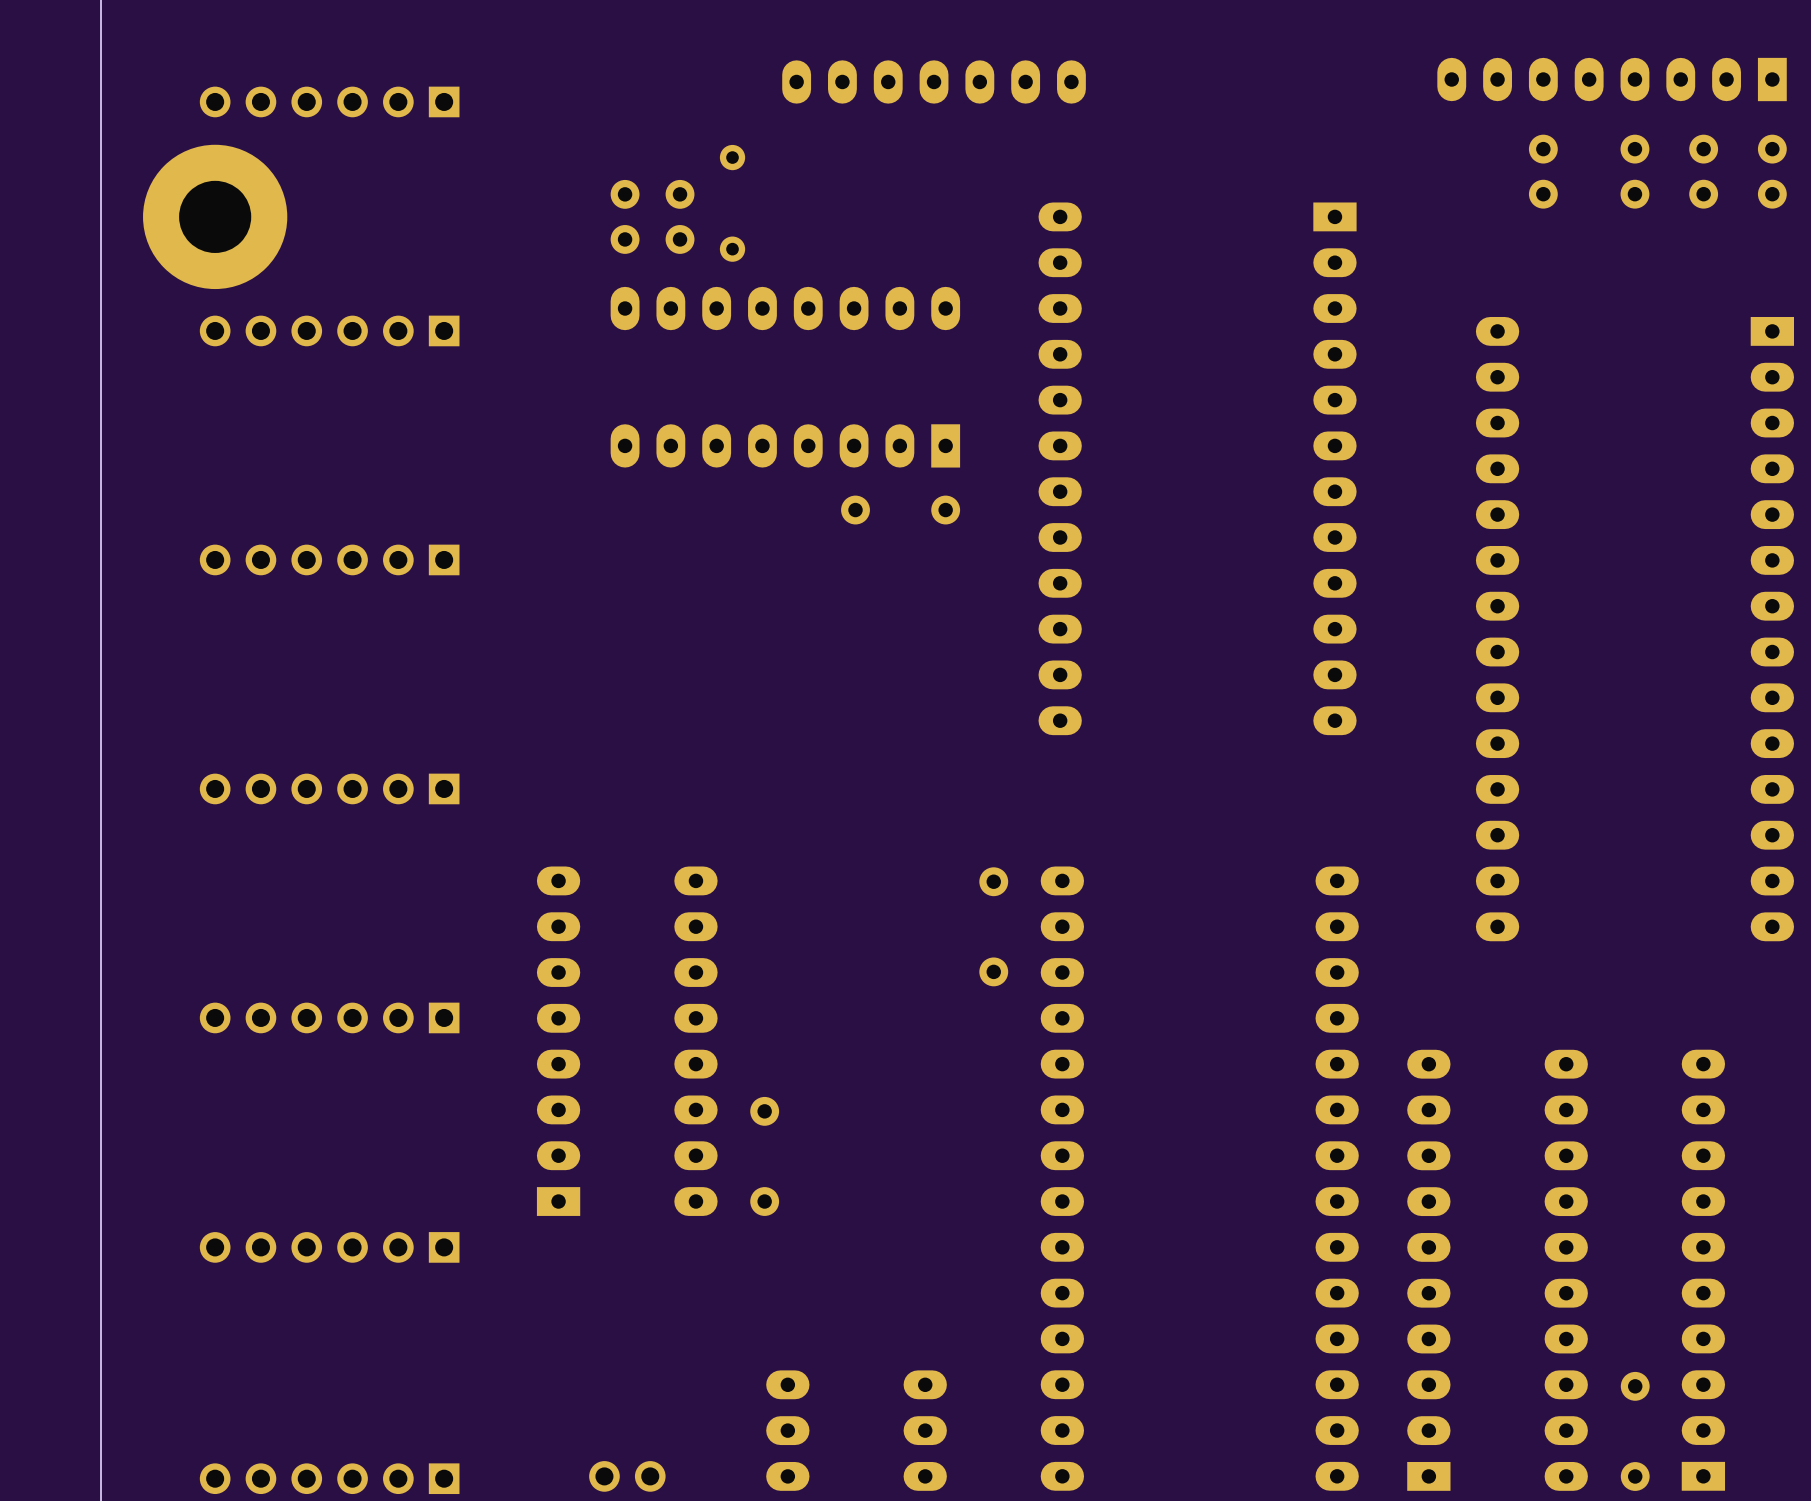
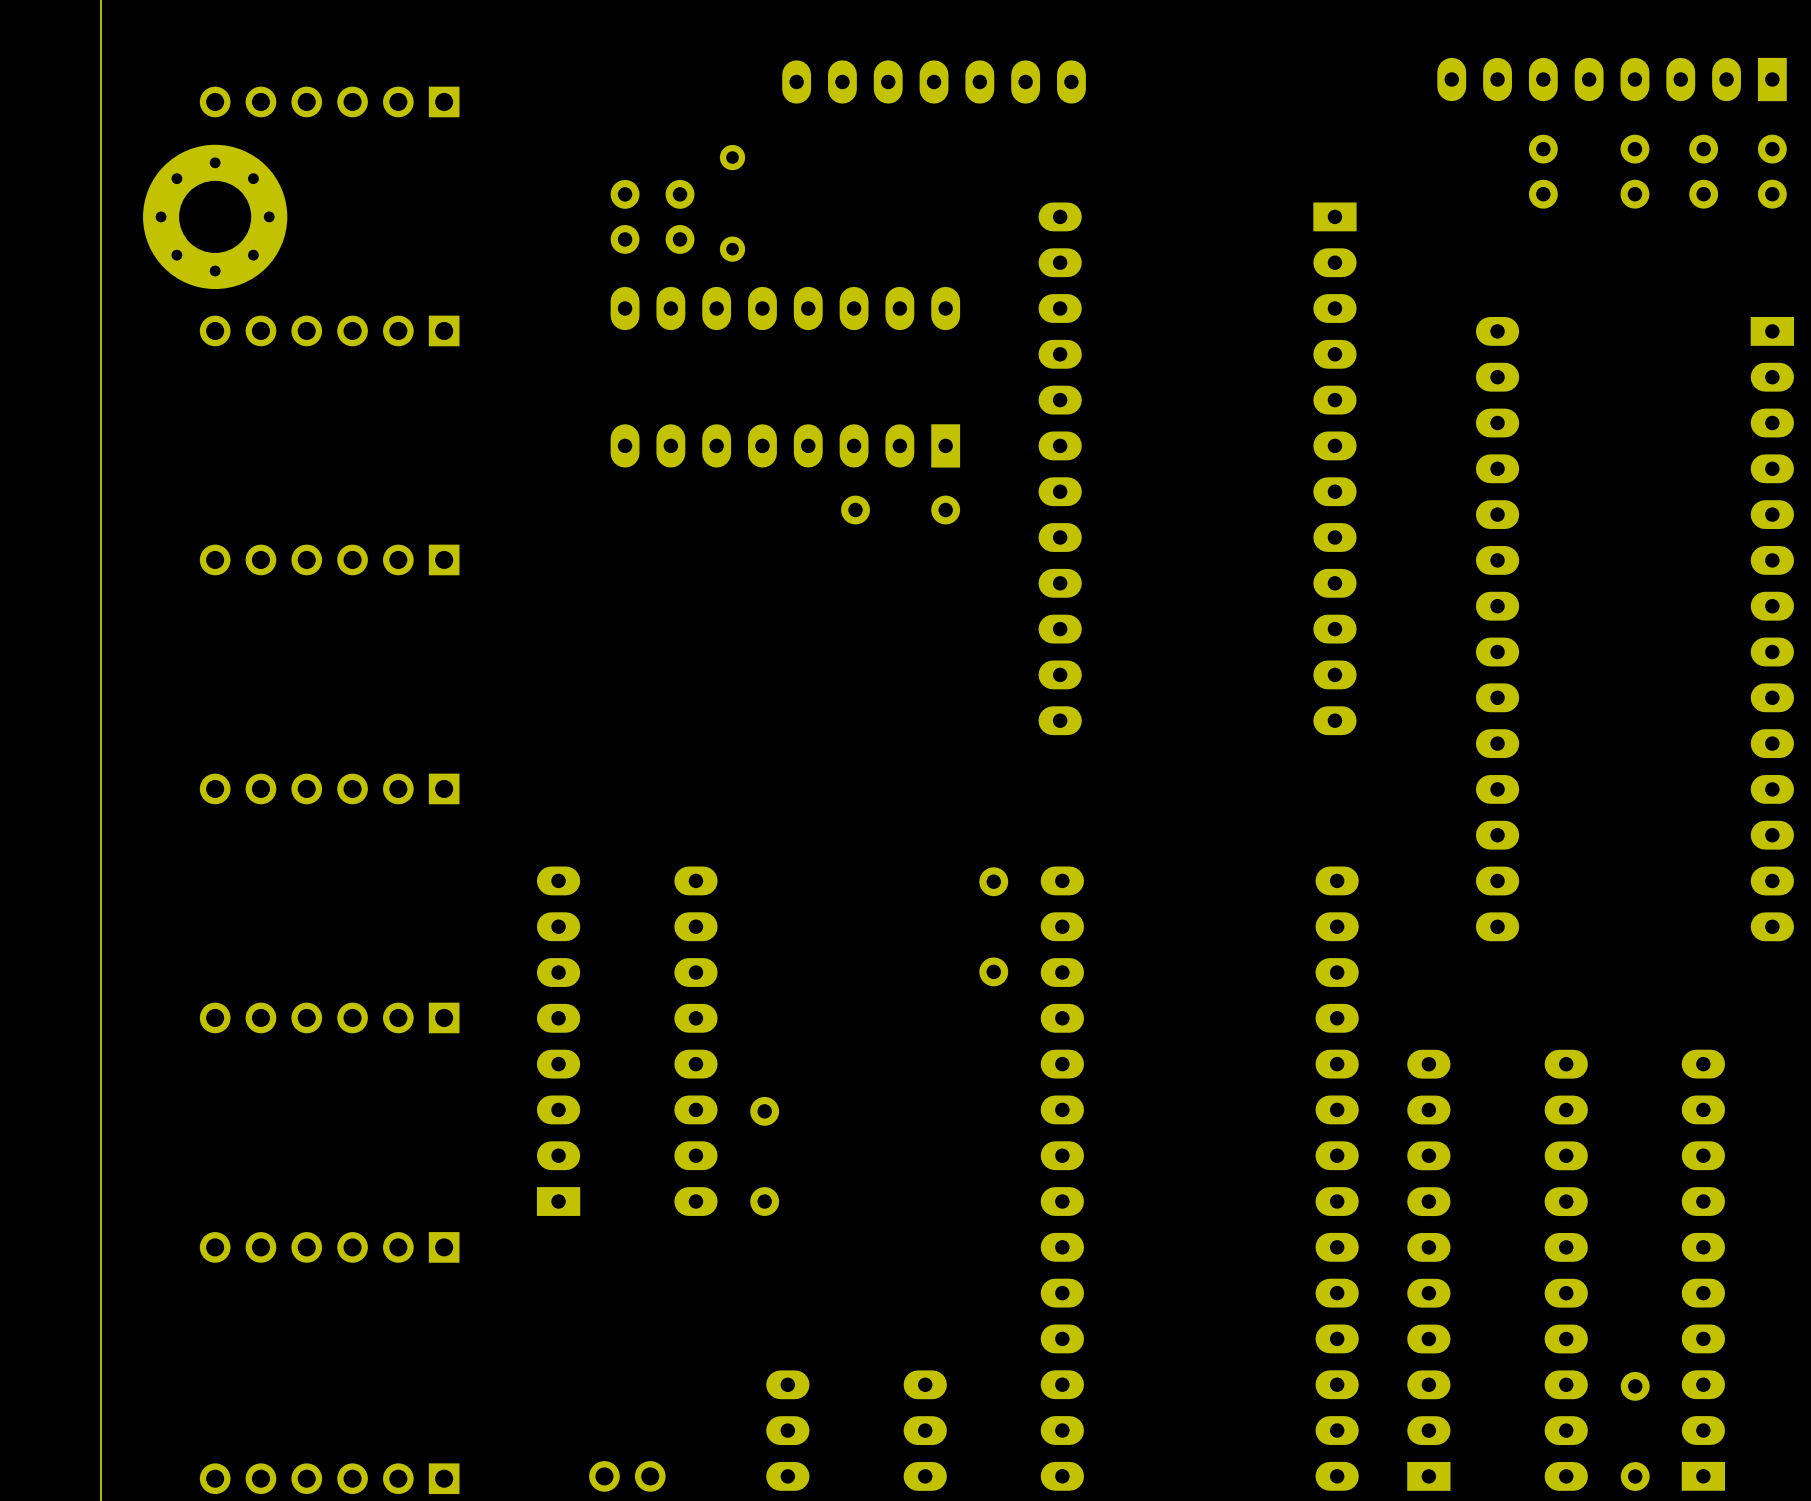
part footprint: [143, 144, 288, 290] -> [143, 144, 288, 290]

